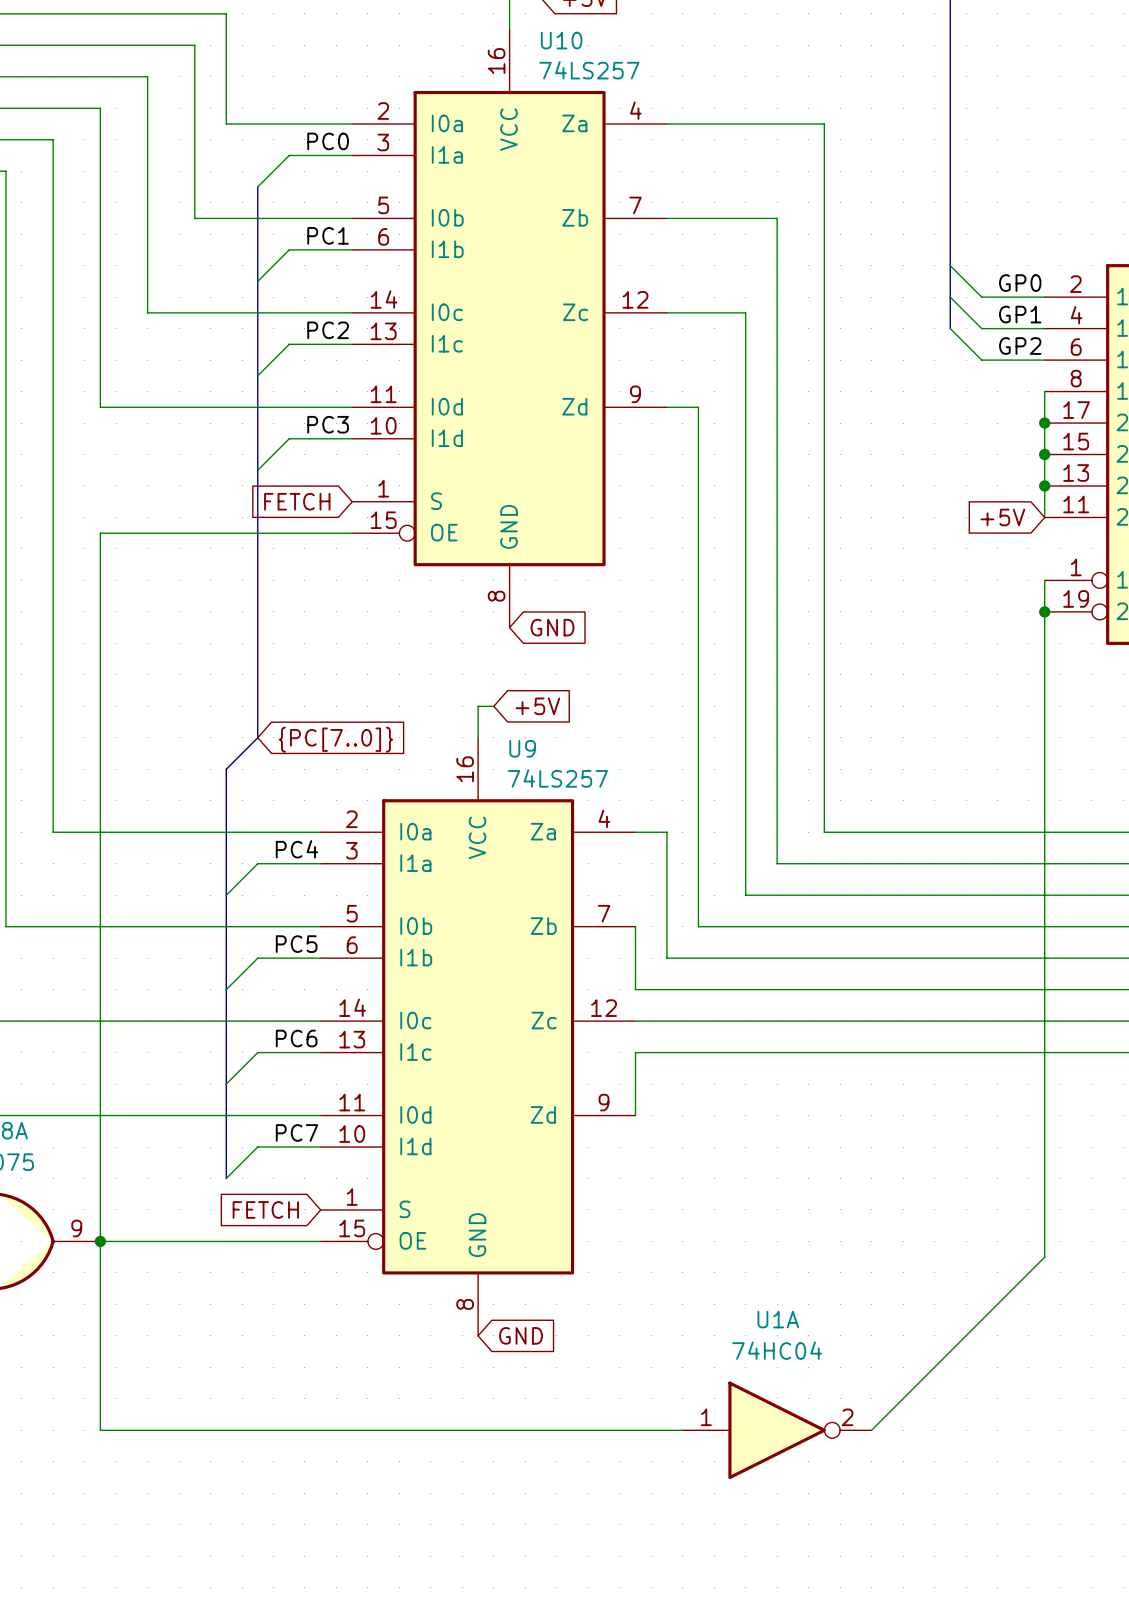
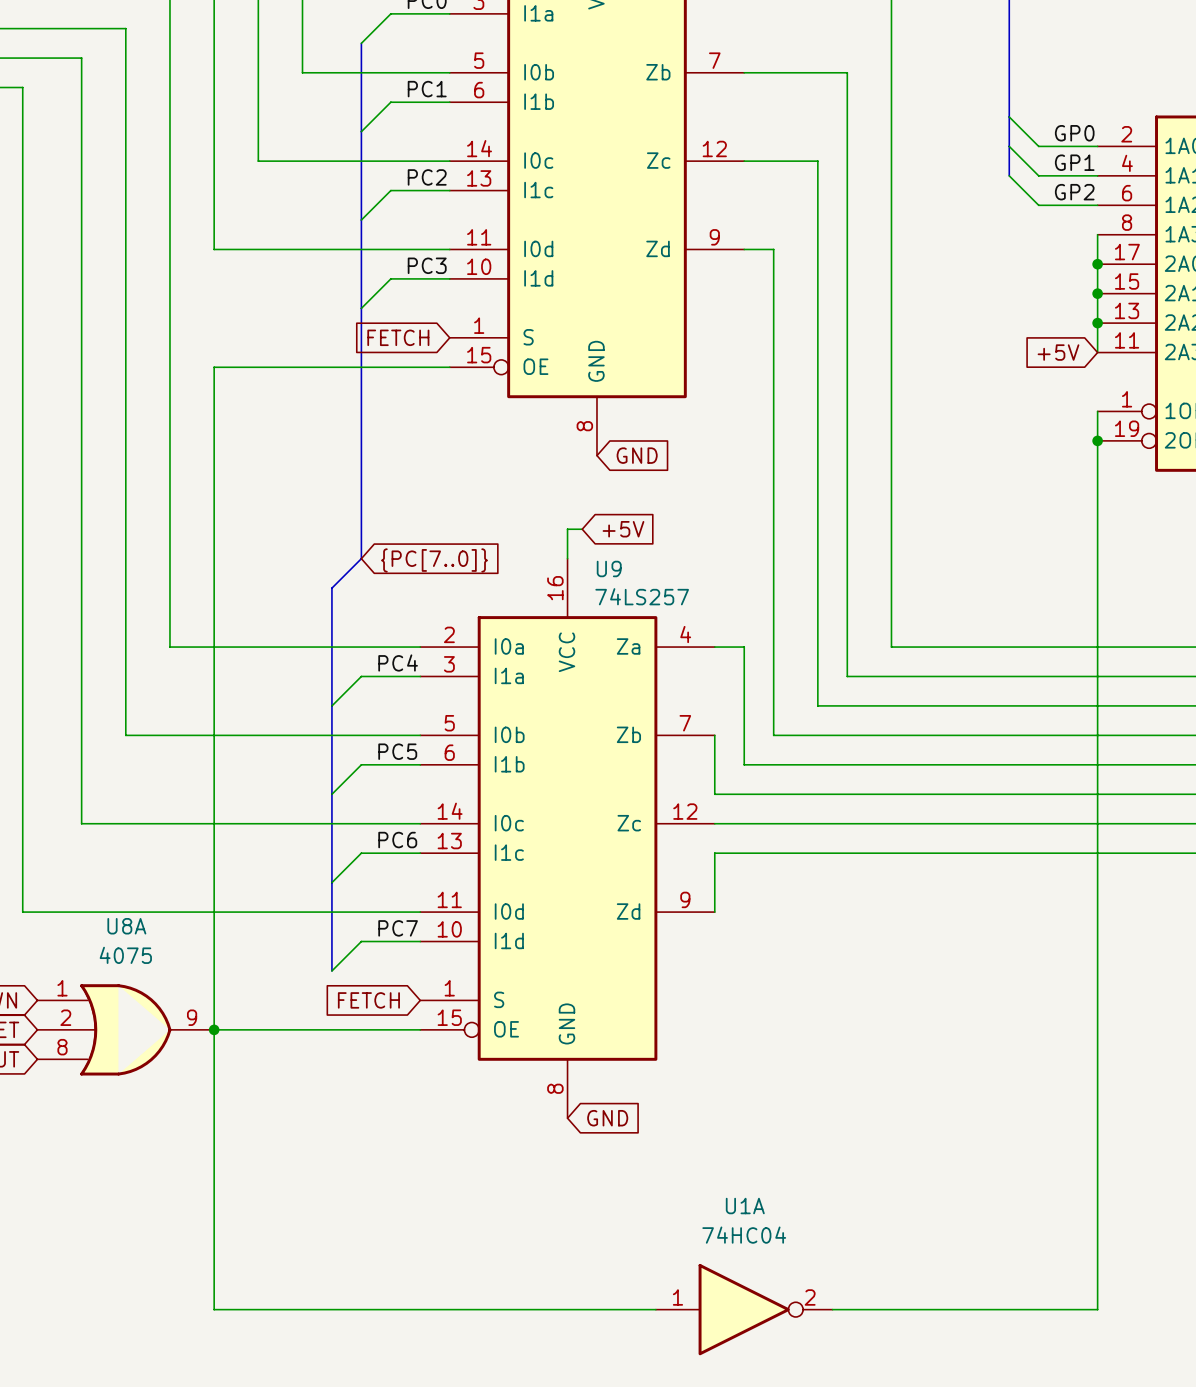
wire: (1044, 1257) (871, 1430) -> (1097, 1044) (1097, 1309) (832, 1309)
wire: (100, 1430) (682, 1430) -> (214, 1206) (214, 1309) (655, 1309)
U1A position: (777, 1430) -> (744, 1309)

